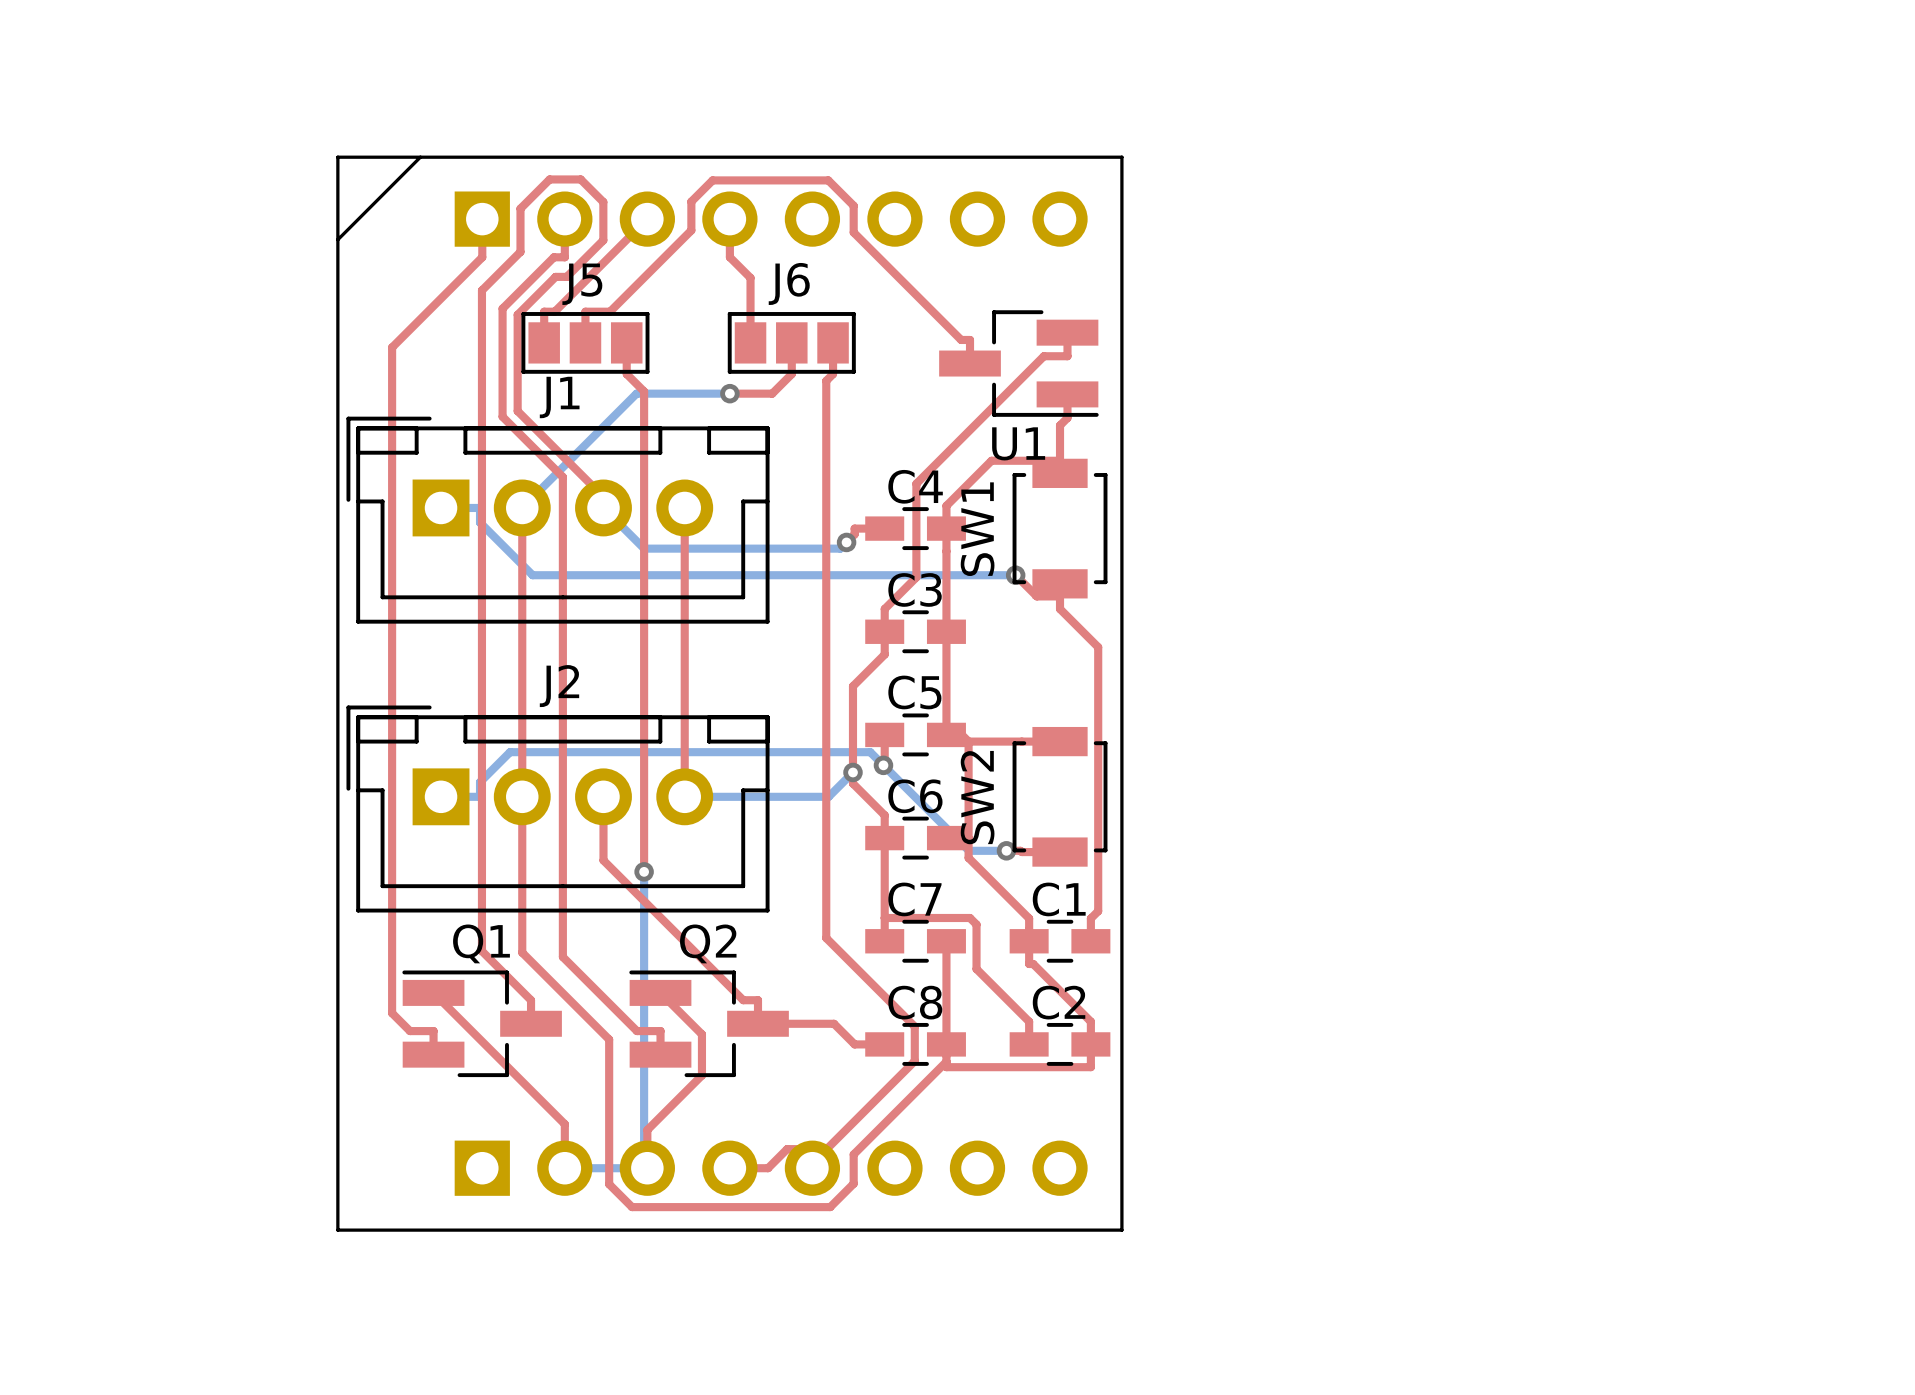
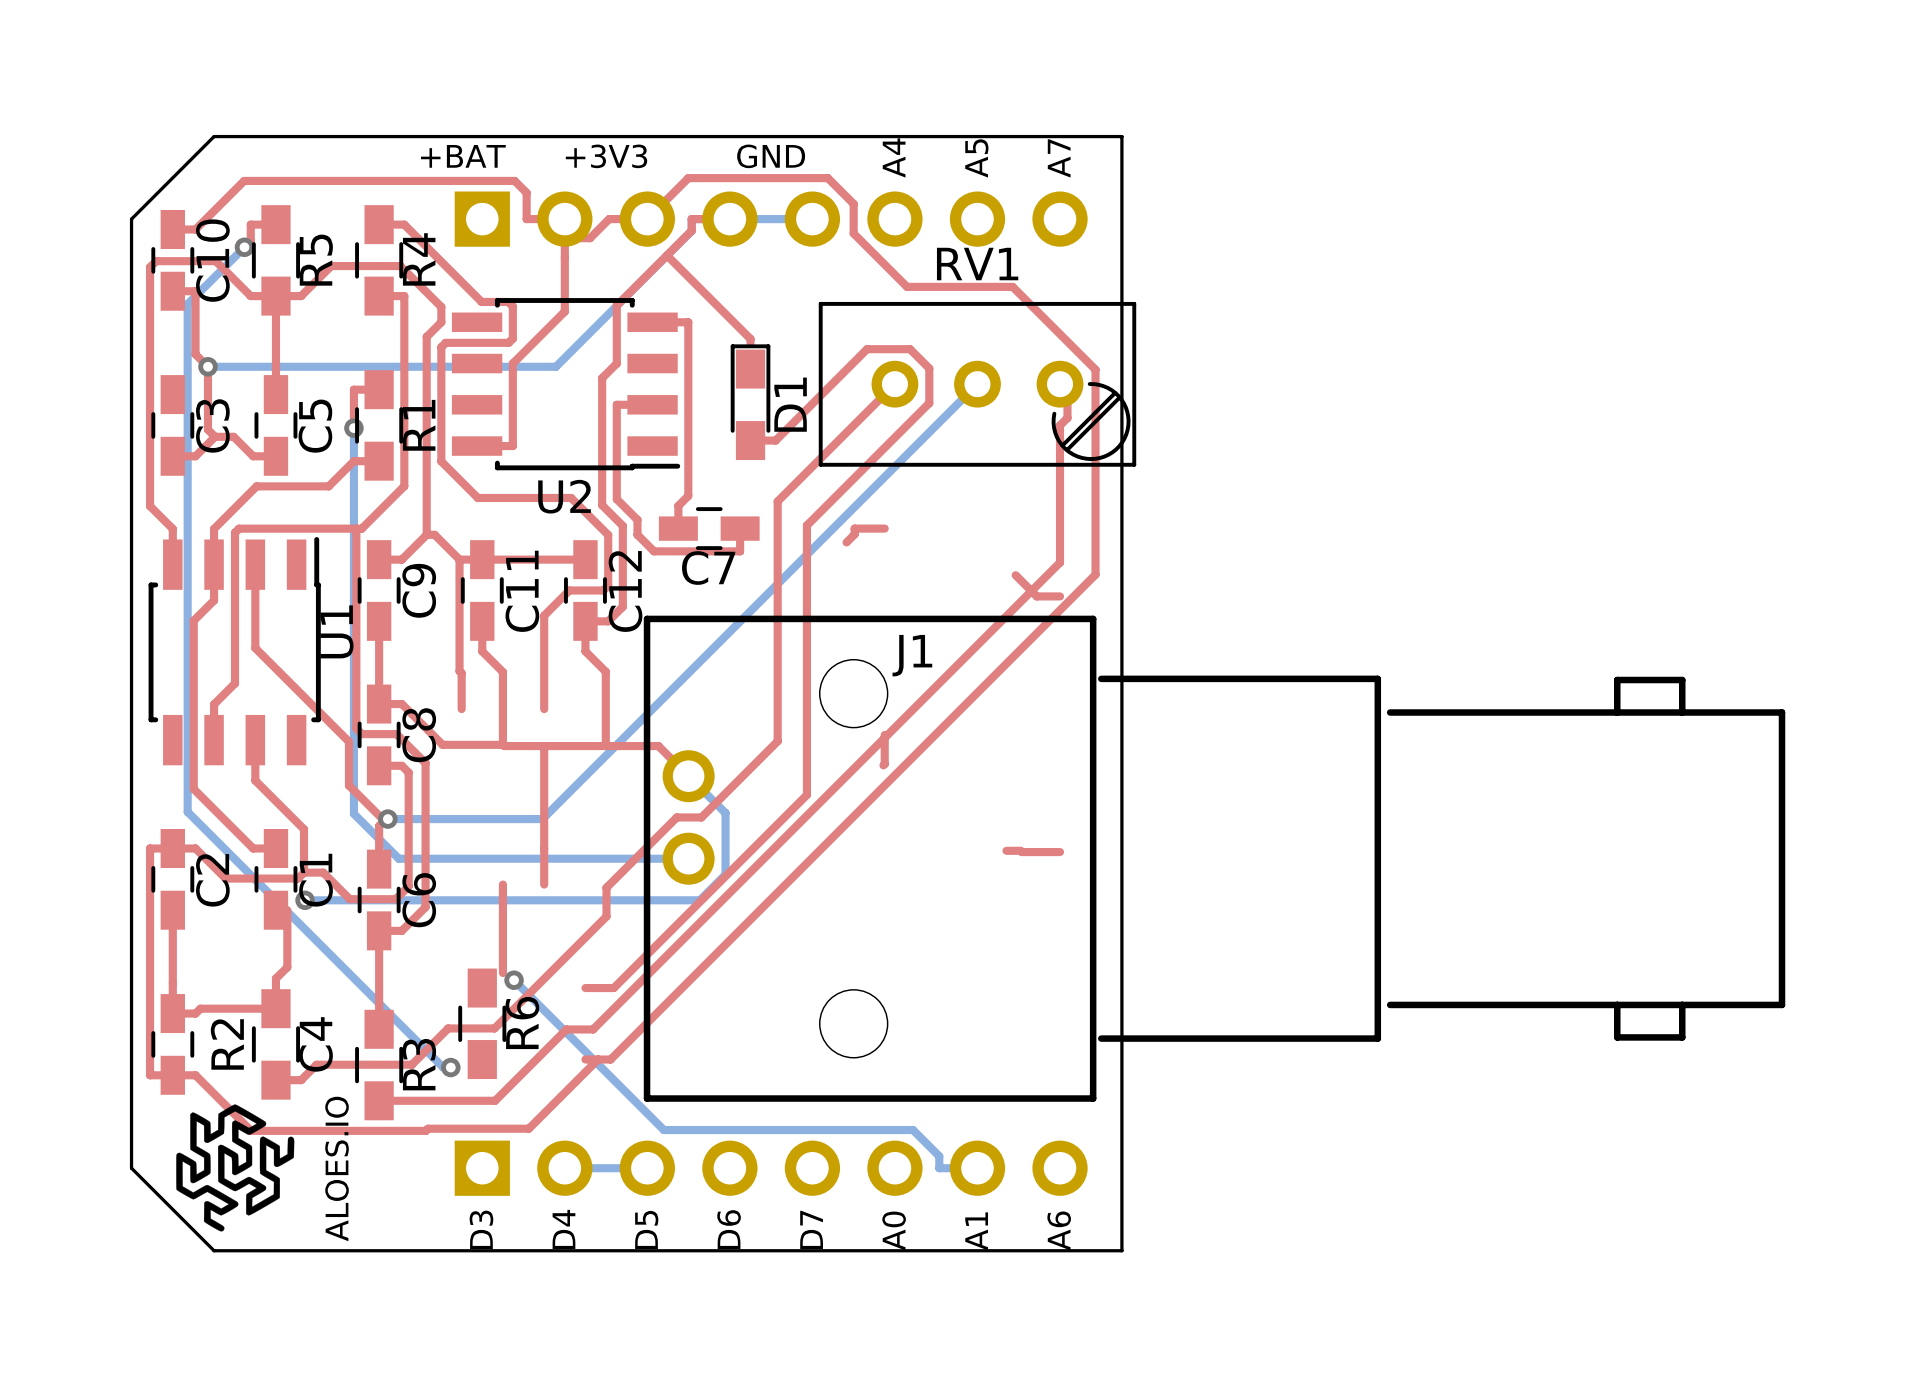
text: none -> +BAT (463, 156)
text: none -> +3V3 (606, 156)
text: none -> GND (771, 156)
board edge: (420, 157) (337, 239) -> none
text: none -> A4 (894, 157)
board edge: (1121, 157) (337, 157) (337, 1230) (1121, 1230) -> (1121, 157) (1121, 136) (214, 136) (131, 219) (131, 1168) (214, 1250) (1121, 1250) (1121, 1230)
text: none -> A5 (976, 158)
text: none -> A7 (1059, 158)
top track: (853, 205) (828, 180) (712, 180) (691, 201) (691, 230) (610, 311) (585, 311) (585, 342) -> (853, 205) (827, 178) (688, 178) (647, 219) (609, 219) (590, 238) (564, 238)
top track: (482, 219) (482, 257) (392, 347) (392, 1013) (409, 1031) (433, 1031) (433, 1054) -> none
top track: none -> (564, 219) (526, 219) (526, 192) (514, 180) (244, 180) (195, 229) (172, 229)
top track: (647, 219) (554, 311) (544, 311) (544, 342) -> none
top track: (729, 219) (729, 257) (750, 277) (750, 338) -> (666, 255) (750, 338)
top track: none -> (729, 219) (691, 219) (691, 230) (616, 305) (616, 363) (602, 378) (602, 505) (622, 525) (622, 606) (608, 621) (585, 621) (585, 651) (605, 671) (605, 746)
bottom track: none -> (812, 219) (691, 219) (691, 231) (555, 366) (208, 366)
top track: none -> (275, 224) (250, 224) (250, 241) (244, 247)
top track: none -> (379, 224) (404, 224) (481, 301) (508, 301) (512, 306) (512, 338) (508, 342) (445, 342) (441, 347) (441, 461) (477, 497) (571, 497) (608, 535) (608, 585) (603, 590) (569, 590) (544, 615) (544, 709)
top track: (853, 232) (961, 339) (970, 339) (970, 363) -> (853, 232) (907, 286) (1012, 286) (1095, 369) (1095, 574) (610, 1059) (585, 1059)
bottom track: none -> (244, 247) (187, 304) (187, 811) (443, 1067) (450, 1067)
via: none -> (244, 247)
top track: (564, 257) (553, 257) (502, 308) (502, 416) (562, 477) (562, 957) (636, 1031) (660, 1031) (660, 1054) -> (564, 257) (564, 311) (512, 363) (512, 446) (477, 446)
C10: none -> (172, 260)
R5: none -> (275, 260)
R4: none -> (379, 260)
top track: none -> (172, 291) (195, 291) (195, 354) (208, 366) (208, 429) (215, 436)
top track: none -> (275, 296) (275, 394)
top track: none -> (379, 296) (404, 296) (404, 486) (361, 528) (239, 528) (235, 532) (235, 683) (214, 704) (214, 740)
U1 footprint: [939, 310, 1099, 417] -> [148, 537, 321, 766]
top track: none -> (652, 322) (688, 322) (688, 495) (678, 505) (678, 528)
top track: (1067, 332) (1067, 356) (1043, 356) (916, 483) (916, 577) (884, 609) (884, 654) (852, 686) (852, 783) (884, 815) (884, 941) -> none
J5: (585, 342) -> none
top track: (626, 342) (626, 374) (644, 391) (644, 871) -> none
top track: (791, 342) (791, 374) (772, 393) (729, 393) -> none
J6: (791, 342) -> none
top track: (833, 342) (833, 374) (826, 380) (826, 938) (914, 1026) (914, 1061) (826, 1149) (787, 1149) (768, 1168) (729, 1168) -> none
via: none -> (208, 366)
U2: none -> (566, 384)
top track: none -> (894, 384) (777, 501) (777, 741) (701, 817) (676, 817) (606, 887) (606, 916) (494, 1028) (448, 1028) (411, 1064) (316, 1064) (301, 1080) (275, 1080)
bottom track: none -> (977, 384) (542, 819) (387, 819)
RV1: none -> (977, 384)
top track: none -> (379, 389) (353, 389) (353, 428)
bottom track: (729, 393) (636, 393) (522, 507) -> none
via: (729, 393) -> none
J1 name position: J1 (559, 397) -> J1 (912, 655)
D1: none -> (750, 402)
top track: none -> (652, 404) (616, 404) (616, 499) (637, 519) (637, 534) (654, 551) (740, 551) (740, 528)
J1 footprint: [346, 416, 770, 624] -> [643, 615, 1786, 1102]
R1: none -> (379, 425)
bottom track: none -> (353, 428) (353, 813) (398, 858) (688, 858)
via: none -> (353, 428)
top track: none -> (215, 436) (233, 436) (253, 456) (275, 456)
top track: none -> (215, 436) (195, 456) (172, 456)
top track: none -> (750, 440) (775, 440) (867, 349) (910, 349) (929, 368) (929, 403) (806, 525) (806, 794) (613, 988) (585, 988)
U1 name position: U1 (1018, 443) -> U1 (336, 631)
top track: (1060, 460) (991, 460) (946, 505) (946, 734) (961, 734) (968, 741) -> none
top track: none -> (379, 461) (353, 461) (328, 486) (256, 486) (214, 528) (214, 600) (193, 620) (193, 789) (253, 848) (275, 848)
top track: none -> (1060, 473) (1060, 562) (593, 1029) (566, 1029) (495, 1100) (379, 1100)
C4 name position: C4 (915, 486) -> C4 (316, 1044)
bottom track: (441, 507) (480, 507) (480, 522) (532, 575) (1015, 575) -> none
top track: (522, 507) (522, 952) (609, 1039) (609, 1184) (632, 1207) (830, 1207) (853, 1183) (853, 1154) (946, 1061) -> none
top track: (603, 507) (603, 496) (517, 411) (517, 314) (555, 276) (566, 276) (603, 240) (603, 202) (580, 179) (549, 179) (520, 208) (520, 251) (481, 290) (481, 951) (531, 1000) (531, 1023) -> none
bottom track: (603, 507) (644, 548) (840, 548) (846, 542) -> none
top track: (684, 507) (684, 796) -> none
top track: none -> (356, 528) (356, 728) (362, 734) (396, 734) (425, 763) (425, 907) (401, 930) (379, 930) (379, 1029)
C4 rotation: 0° (915, 528) -> 90° clockwise (172, 1044)
C4 position: (915, 528) -> (172, 1044)
SW1: (1060, 528) -> none
top track: none -> (426, 534) (434, 534) (459, 559)
top track: none -> (426, 534) (426, 336) (441, 322) (441, 307) (400, 266) (331, 266) (301, 296) (250, 296) (215, 261) (156, 261) (150, 267) (150, 506) (172, 528) (172, 564)
top track: none -> (426, 534) (401, 559) (379, 559)
via: (846, 542) -> none
top track: none -> (459, 559) (585, 559)
top track: none -> (459, 559) (459, 671) (461, 673) (461, 709)
top track: none -> (255, 564) (255, 648) (348, 741) (348, 785) (384, 820)
via: (1015, 575) -> none
top track: (1060, 583) (1060, 609) (1098, 647) (1098, 911) (1090, 918) (1090, 941) -> none
C9: none -> (379, 590)
C11: none -> (482, 590)
C12: none -> (585, 590)
top track: none -> (379, 621) (379, 704) (401, 704) (442, 744) (502, 744)
top track: none -> (482, 621) (482, 651) (502, 672) (502, 744)
C3 rotation: 0° (915, 631) -> 90° clockwise (172, 425)
C3 position: (915, 631) -> (172, 425)
C5 rotation: 0° (915, 734) -> 90° clockwise (275, 425)
C5 position: (915, 734) -> (275, 425)
top track: none -> (255, 740) (255, 780) (304, 829) (304, 872)
top track: (968, 741) (1060, 741) -> none
top track: (968, 741) (968, 857) (1029, 918) (1029, 964) (1033, 964) (1090, 1021) (1090, 1067) (946, 1067) (946, 941) -> none
top track: none -> (502, 744) (658, 746) (688, 776)
top track: none -> (544, 746) (544, 884)
top track: none -> (379, 765) (401, 765) (408, 772) (408, 886) (395, 899) (349, 899) (323, 872) (304, 872)
via: (883, 765) -> none
bottom track: (852, 772) (828, 796) (684, 796) -> none
via: (852, 772) -> none
bottom track: none -> (688, 776) (725, 813) (725, 874) (699, 900) (305, 900)
bottom track: (441, 796) (480, 796) (480, 782) (510, 752) (870, 752) (968, 850) (1006, 850) -> none
top track: (603, 796) (603, 860) (743, 1000) (757, 1000) (757, 1023) (834, 1023) (854, 1044) (884, 1044) -> none
SW2: (1060, 796) -> none
J2: (558, 809) -> none
top track: none -> (387, 819) (379, 826) (379, 869)
via: none -> (387, 819)
C6 rotation: 0° (915, 838) -> 90° clockwise (379, 899)
C6 position: (915, 838) -> (379, 899)
via: (1006, 850) -> none
bottom track: (644, 871) (644, 1168) -> none
via: (644, 871) -> none
top track: none -> (304, 872) (298, 878) (225, 878) (195, 848) (150, 848) (150, 1075) (195, 1075) (251, 1130) (528, 1128) (598, 1059)
top track: none -> (502, 884) (502, 973)
C7 name position: C7 (914, 899) -> C7 (708, 568)
via: none -> (305, 900)
top track: none -> (172, 910) (172, 1013) (195, 1013) (200, 1008) (275, 1008) (275, 978) (287, 967) (287, 910)
top track: (884, 917) (969, 917) (976, 924) (976, 969) (1029, 1021) (1029, 1044) -> none
C7 position: (915, 941) -> (709, 528)
C1 rotation: 0° (1060, 941) -> 90° clockwise (275, 879)
C1 position: (1060, 941) -> (275, 879)
bottom track: none -> (514, 980) (663, 1130) (913, 1130) (939, 1156) (939, 1168) (977, 1168)
via: none -> (514, 980)
top track: (433, 992) (564, 1124) (564, 1168) -> none
top track: (660, 992) (701, 1034) (701, 1075) (647, 1130) (647, 1168) -> none
Q1: (482, 1023) -> none
R6: none -> (482, 1023)
Q2: (709, 1023) -> none
R2: none -> (275, 1044)
C8 rotation: 0° (915, 1044) -> 90° clockwise (379, 734)
C8 position: (915, 1044) -> (379, 734)
C2 rotation: 0° (1060, 1044) -> 90° clockwise (172, 879)
C2 position: (1060, 1044) -> (172, 879)
R3: none -> (379, 1065)
via: none -> (450, 1067)
drawing: none -> [176, 1104, 295, 1232]
text: none -> ALOES.IO (337, 1168)
text: none -> D3 (481, 1229)
text: none -> D4 (563, 1229)
text: none -> D5 (646, 1229)
text: none -> D6 (729, 1229)
text: none -> D7 (811, 1229)
text: none -> A6 (1059, 1230)
text: none -> A0 (894, 1231)
text: none -> A1 (976, 1231)

